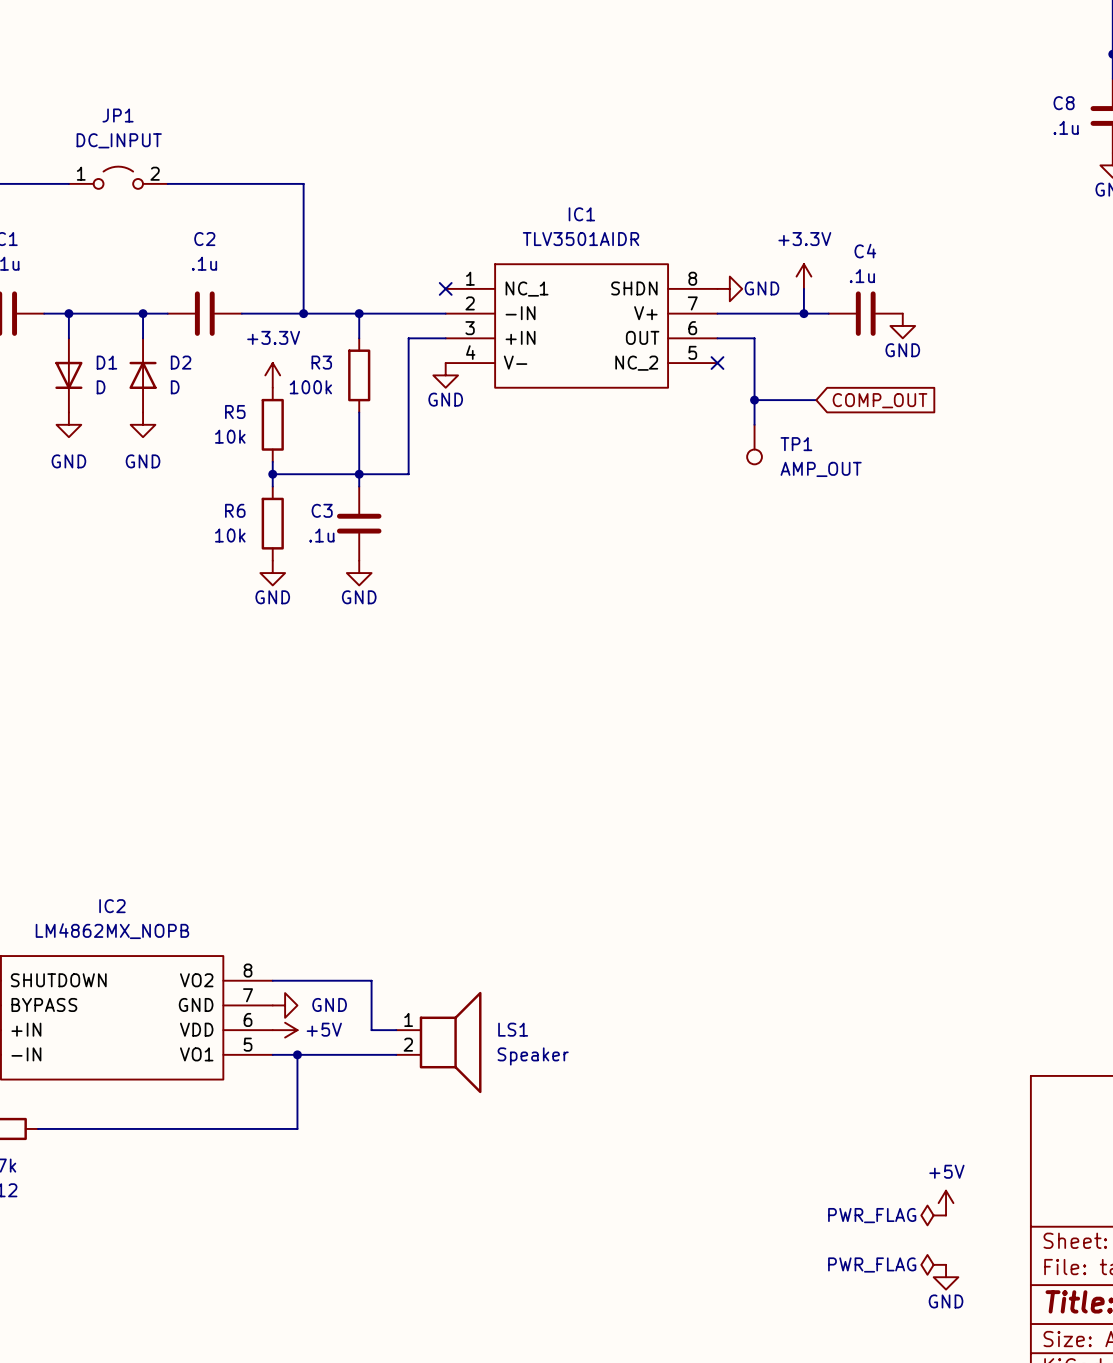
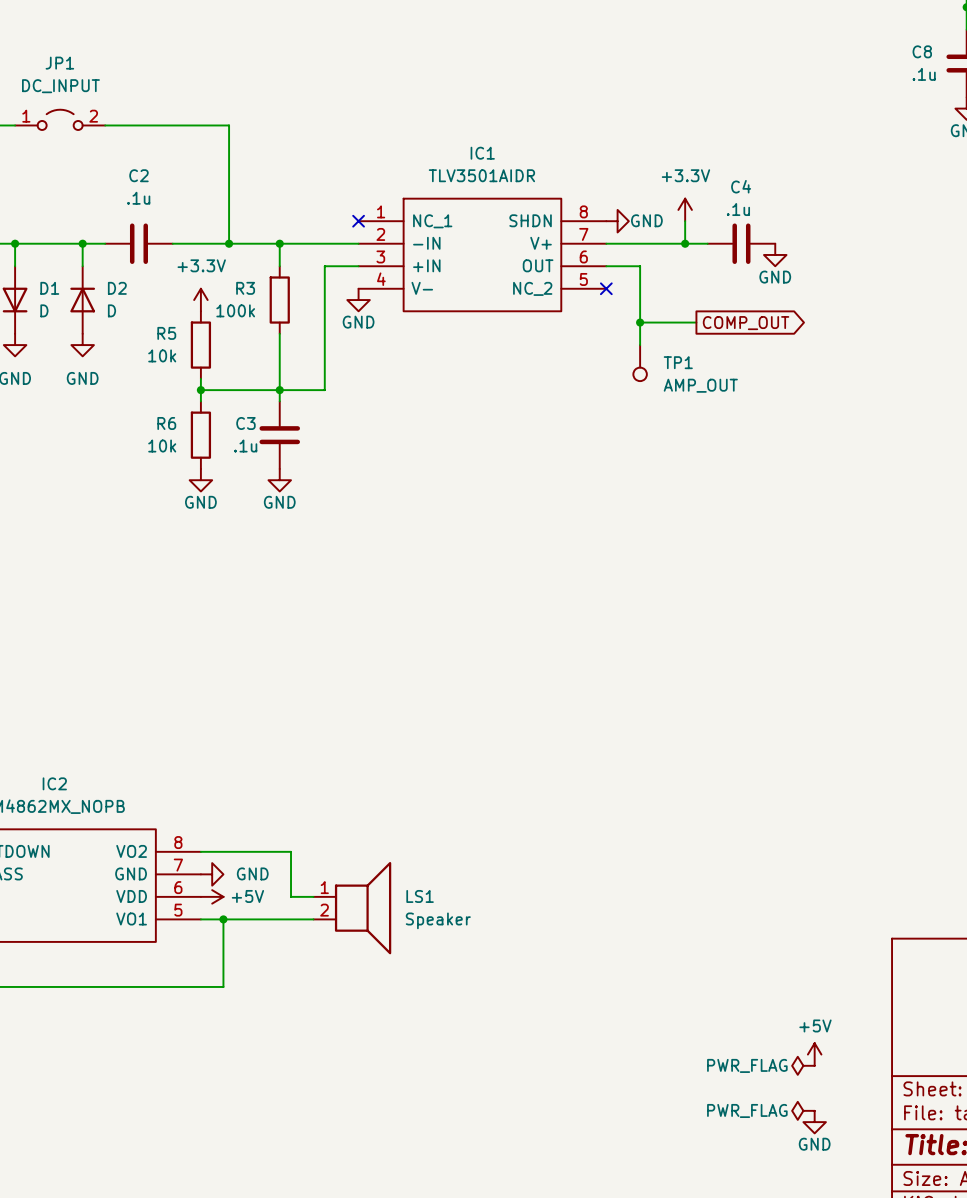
global label shape: input (880, 400) -> output (746, 323)

